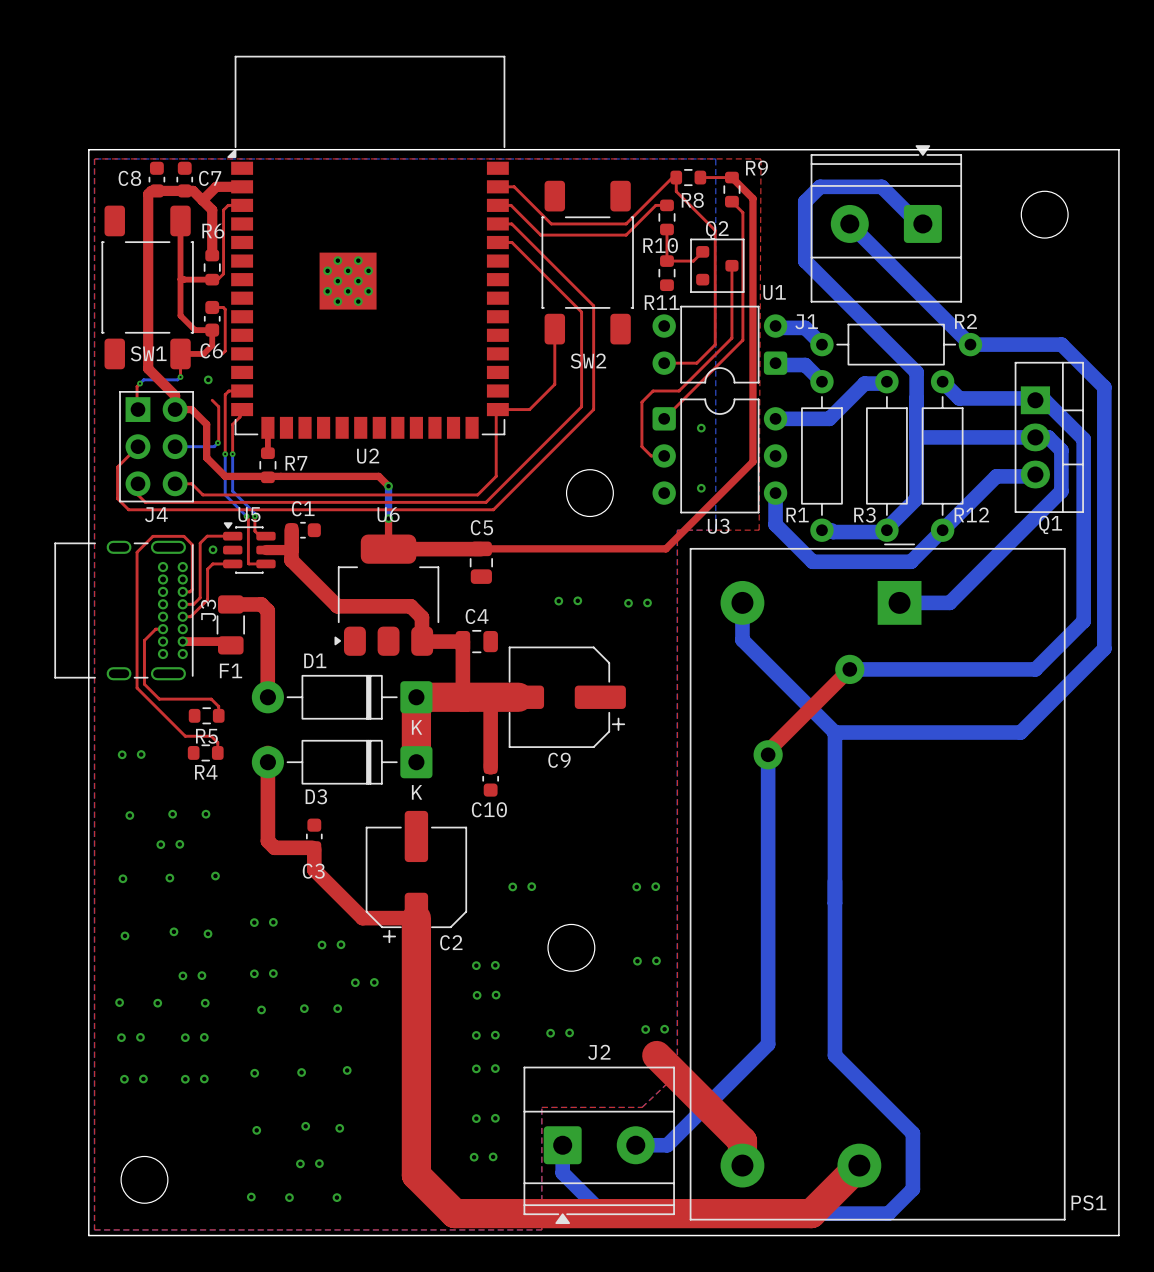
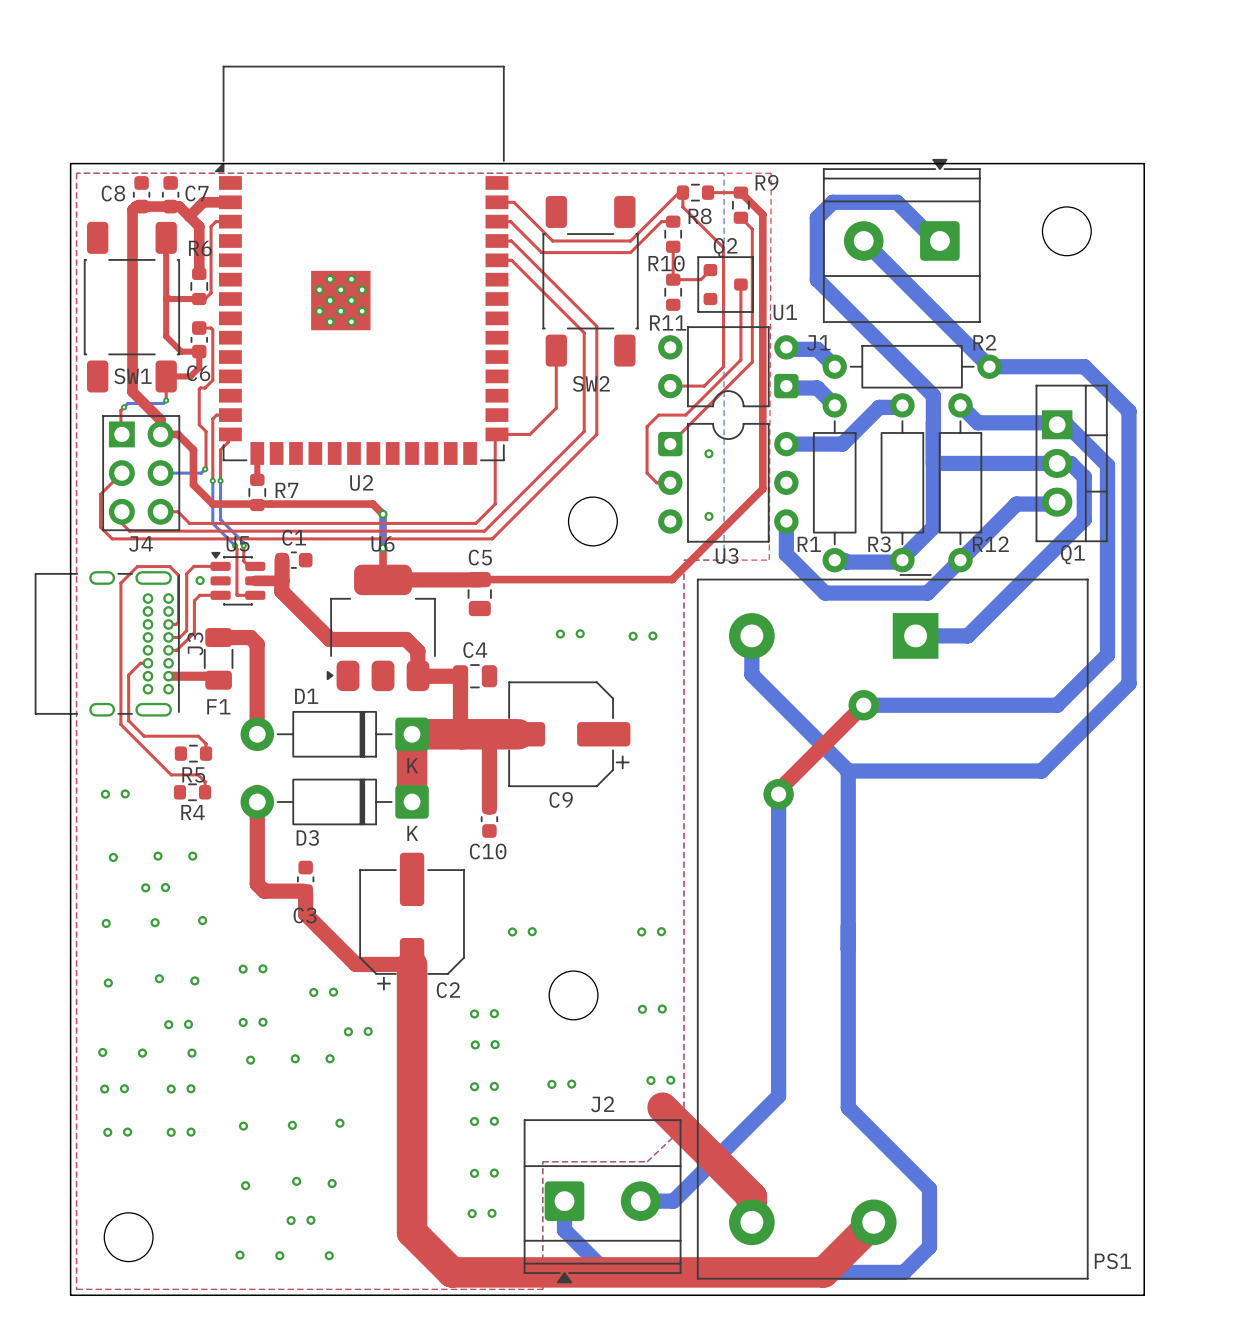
top track: (225, 351) (222, 353) -> (212, 373) (212, 380) (205, 388) (199, 389) (199, 424)
via: (208, 379) -> none

